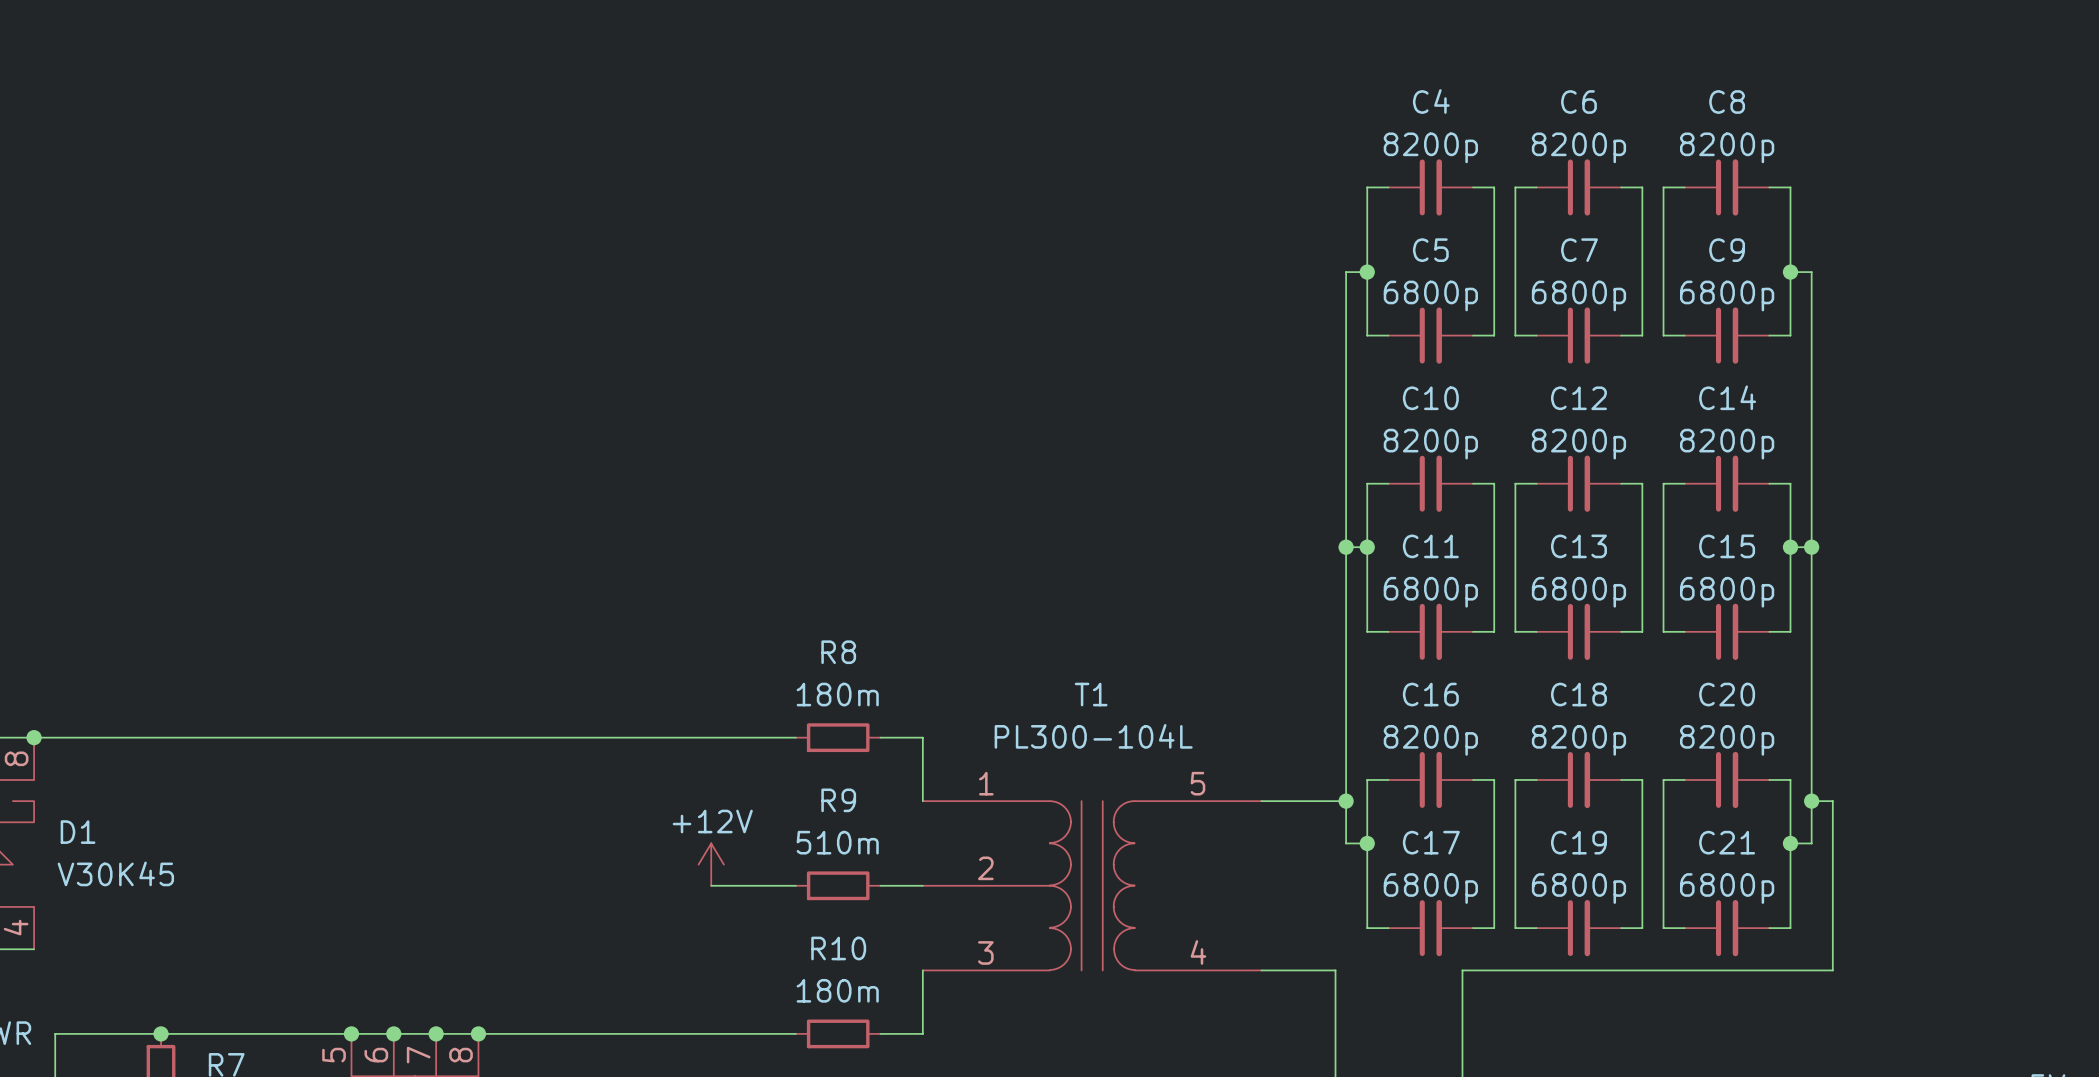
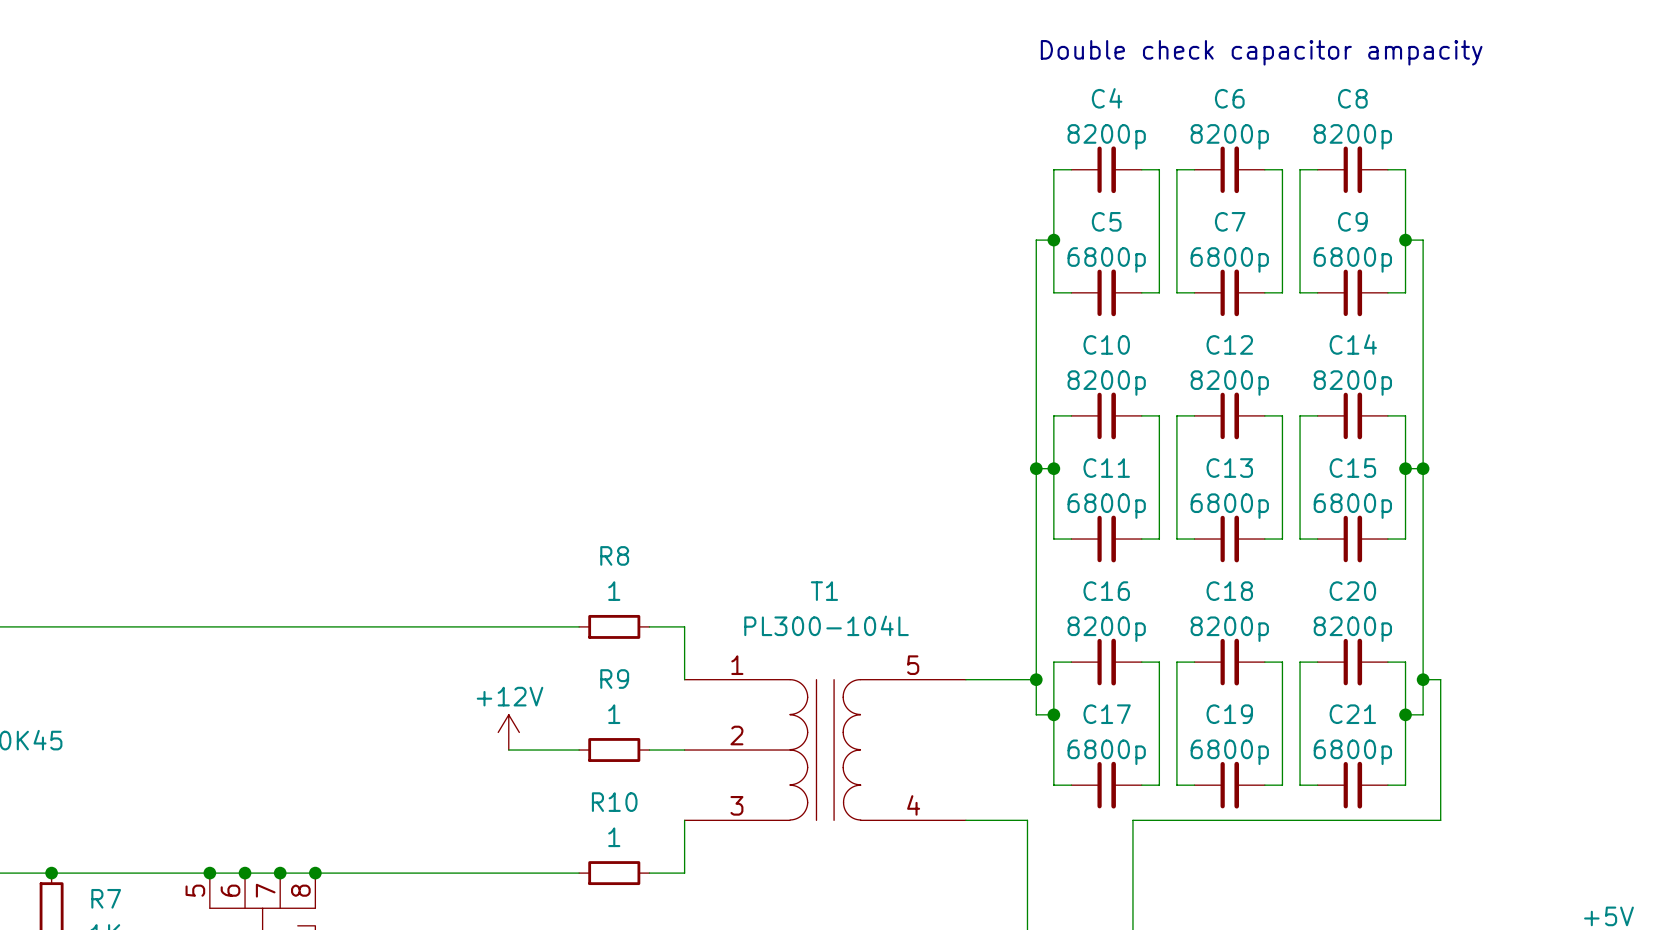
text: none -> Double check capacitor ampacity (1261, 52)
R8 value: 180m (837, 694) -> 1 (614, 591)
R9 value: 510m (837, 842) -> 1 (614, 714)
R10 value: 180m (837, 990) -> 1 (614, 837)

